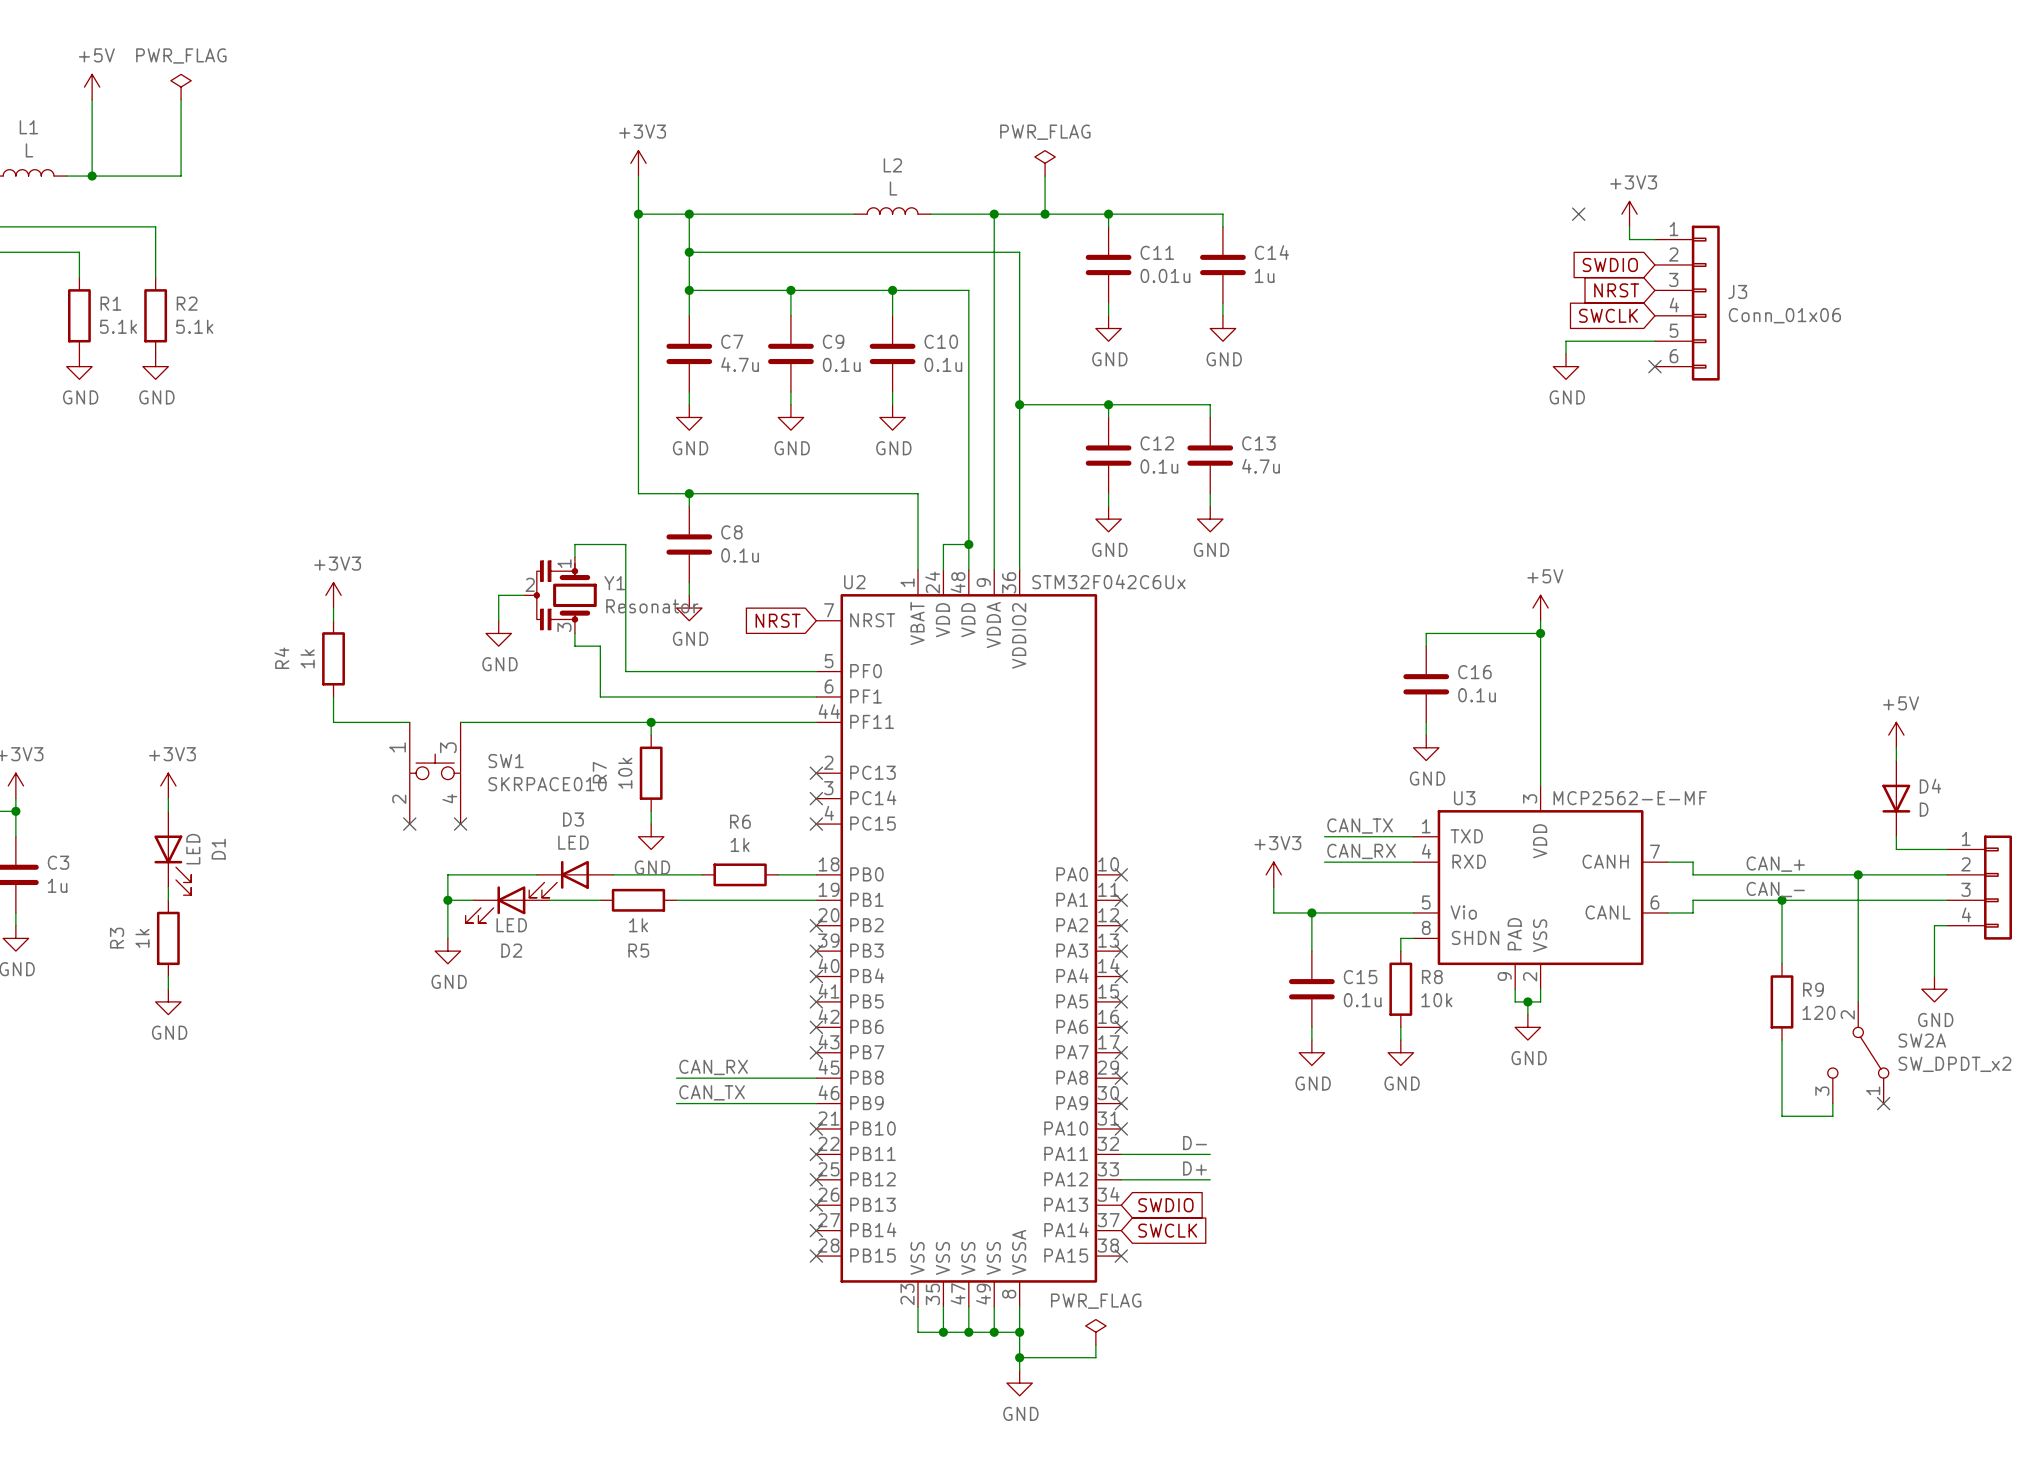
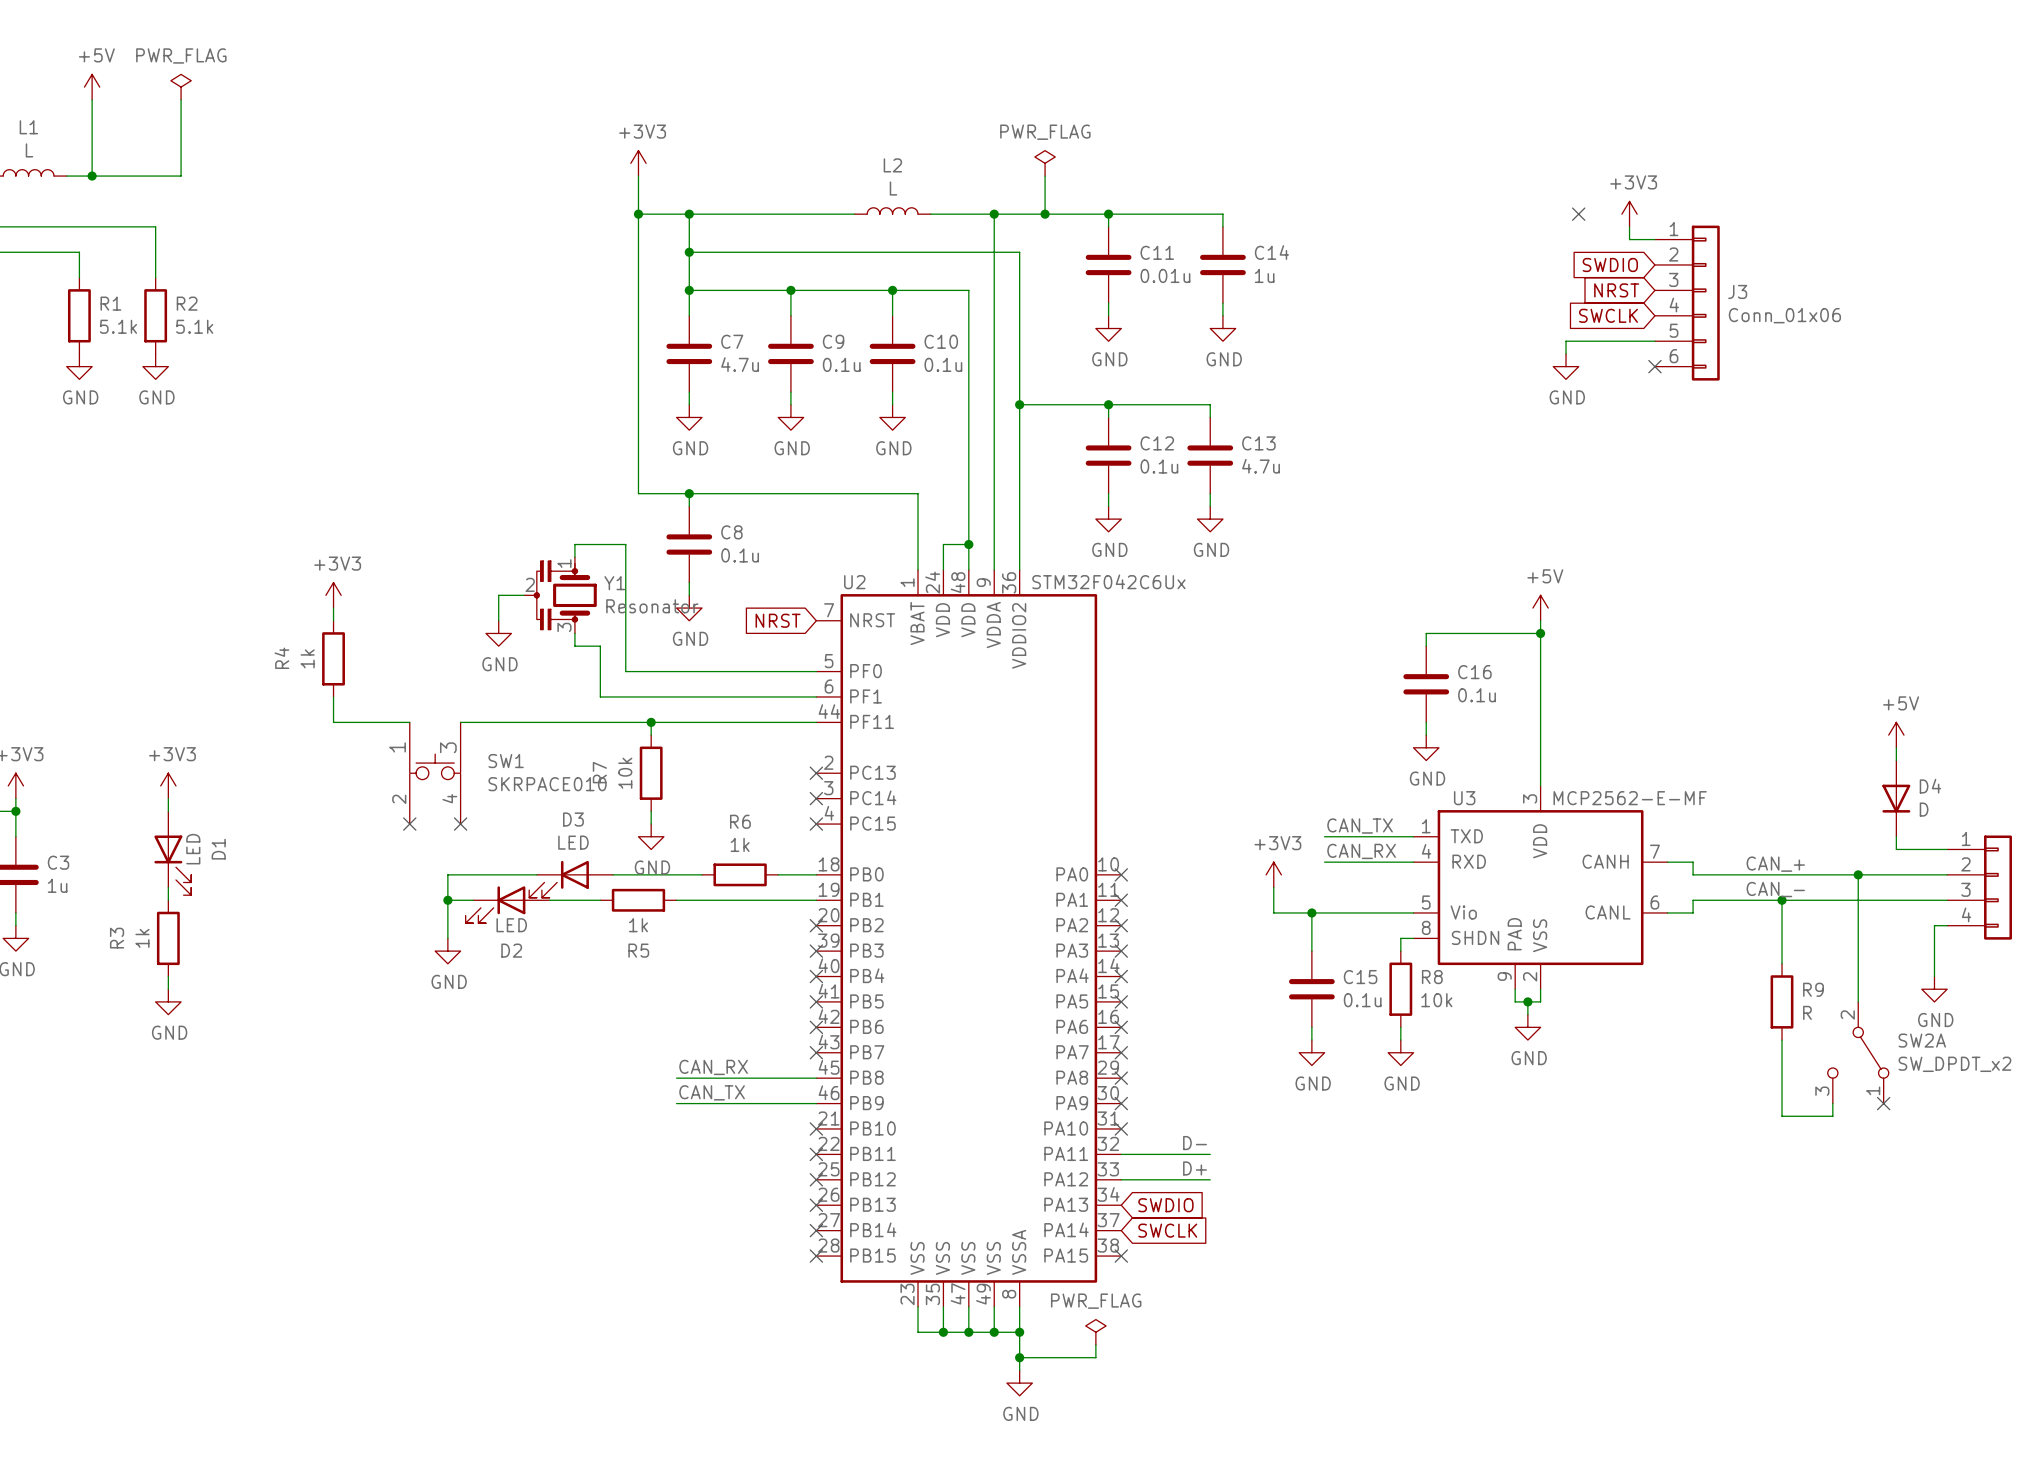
R9 value: 120 (1818, 1012) -> R (1807, 1012)

